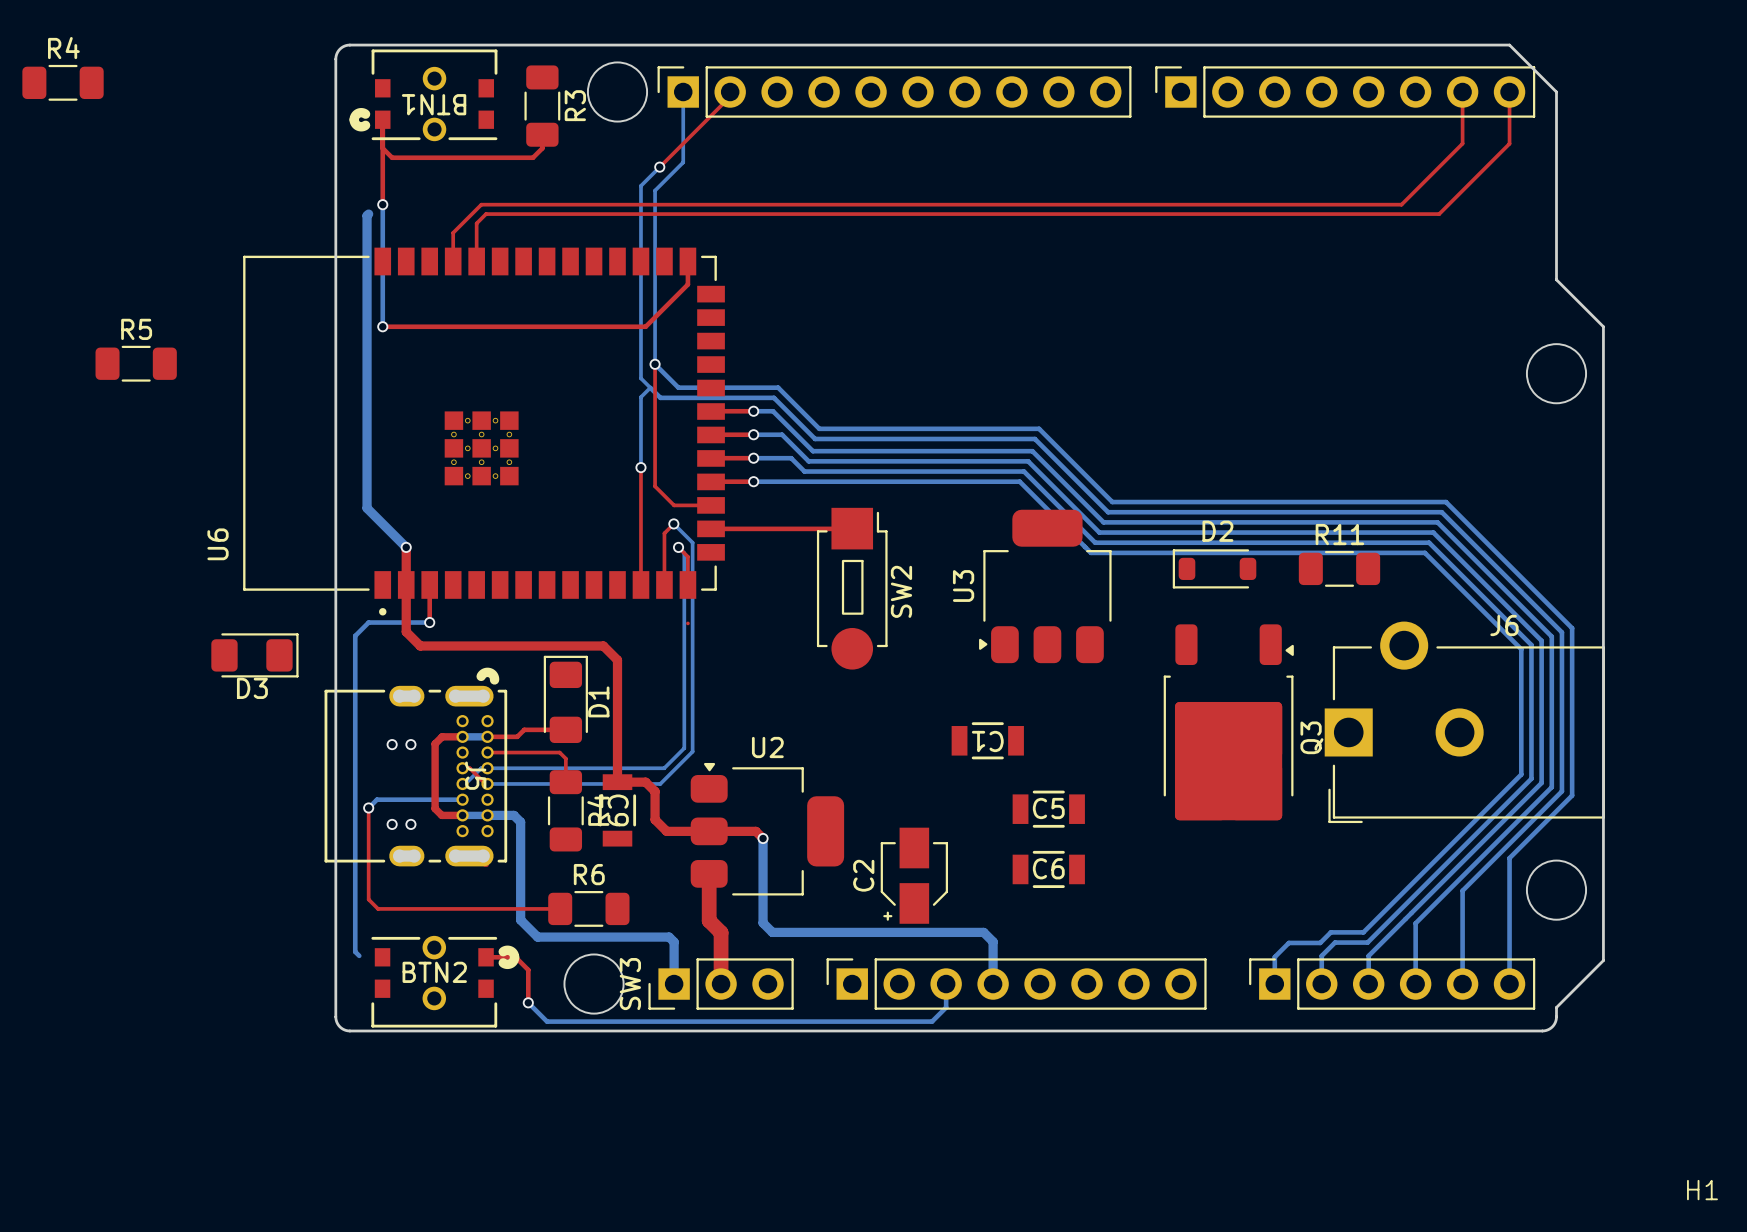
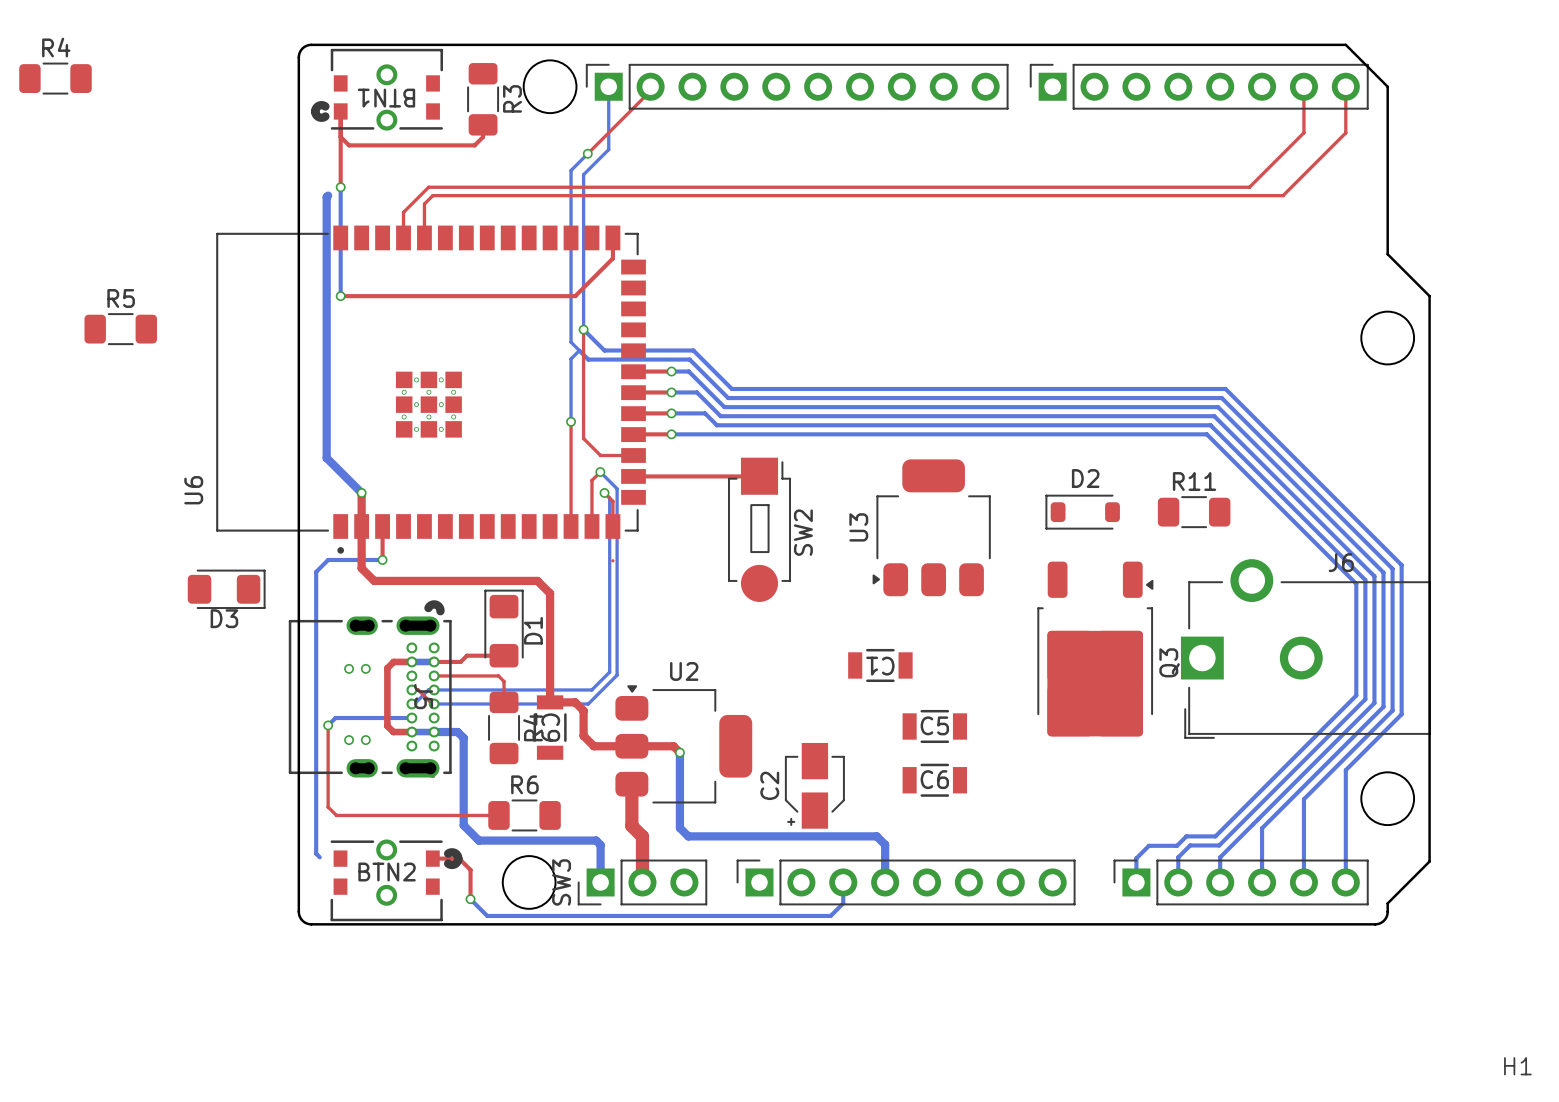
bottom track: (819, 428) (1039, 428) (1112, 502) (1445, 502) -> (730, 387) (731, 389) (1225, 389) (1289, 452)
bottom track: (815, 438) (1034, 438) (1108, 512) (1441, 512) -> (726, 396) (728, 398) (1221, 398) (1285, 461)
bottom track: (1032, 451) (1103, 522) (1437, 522) -> (920, 407) (1218, 407) (1281, 470)
bottom track: (1028, 461) (1099, 532) (1433, 532) -> (916, 416) (1214, 416) (1277, 479)
bottom track: (1024, 471) (1095, 542) (1429, 542) -> (912, 425) (1210, 425) (1274, 488)
bottom track: (1019, 481) (1090, 552) (1424, 552) -> (908, 434) (1206, 434) (1270, 497)

